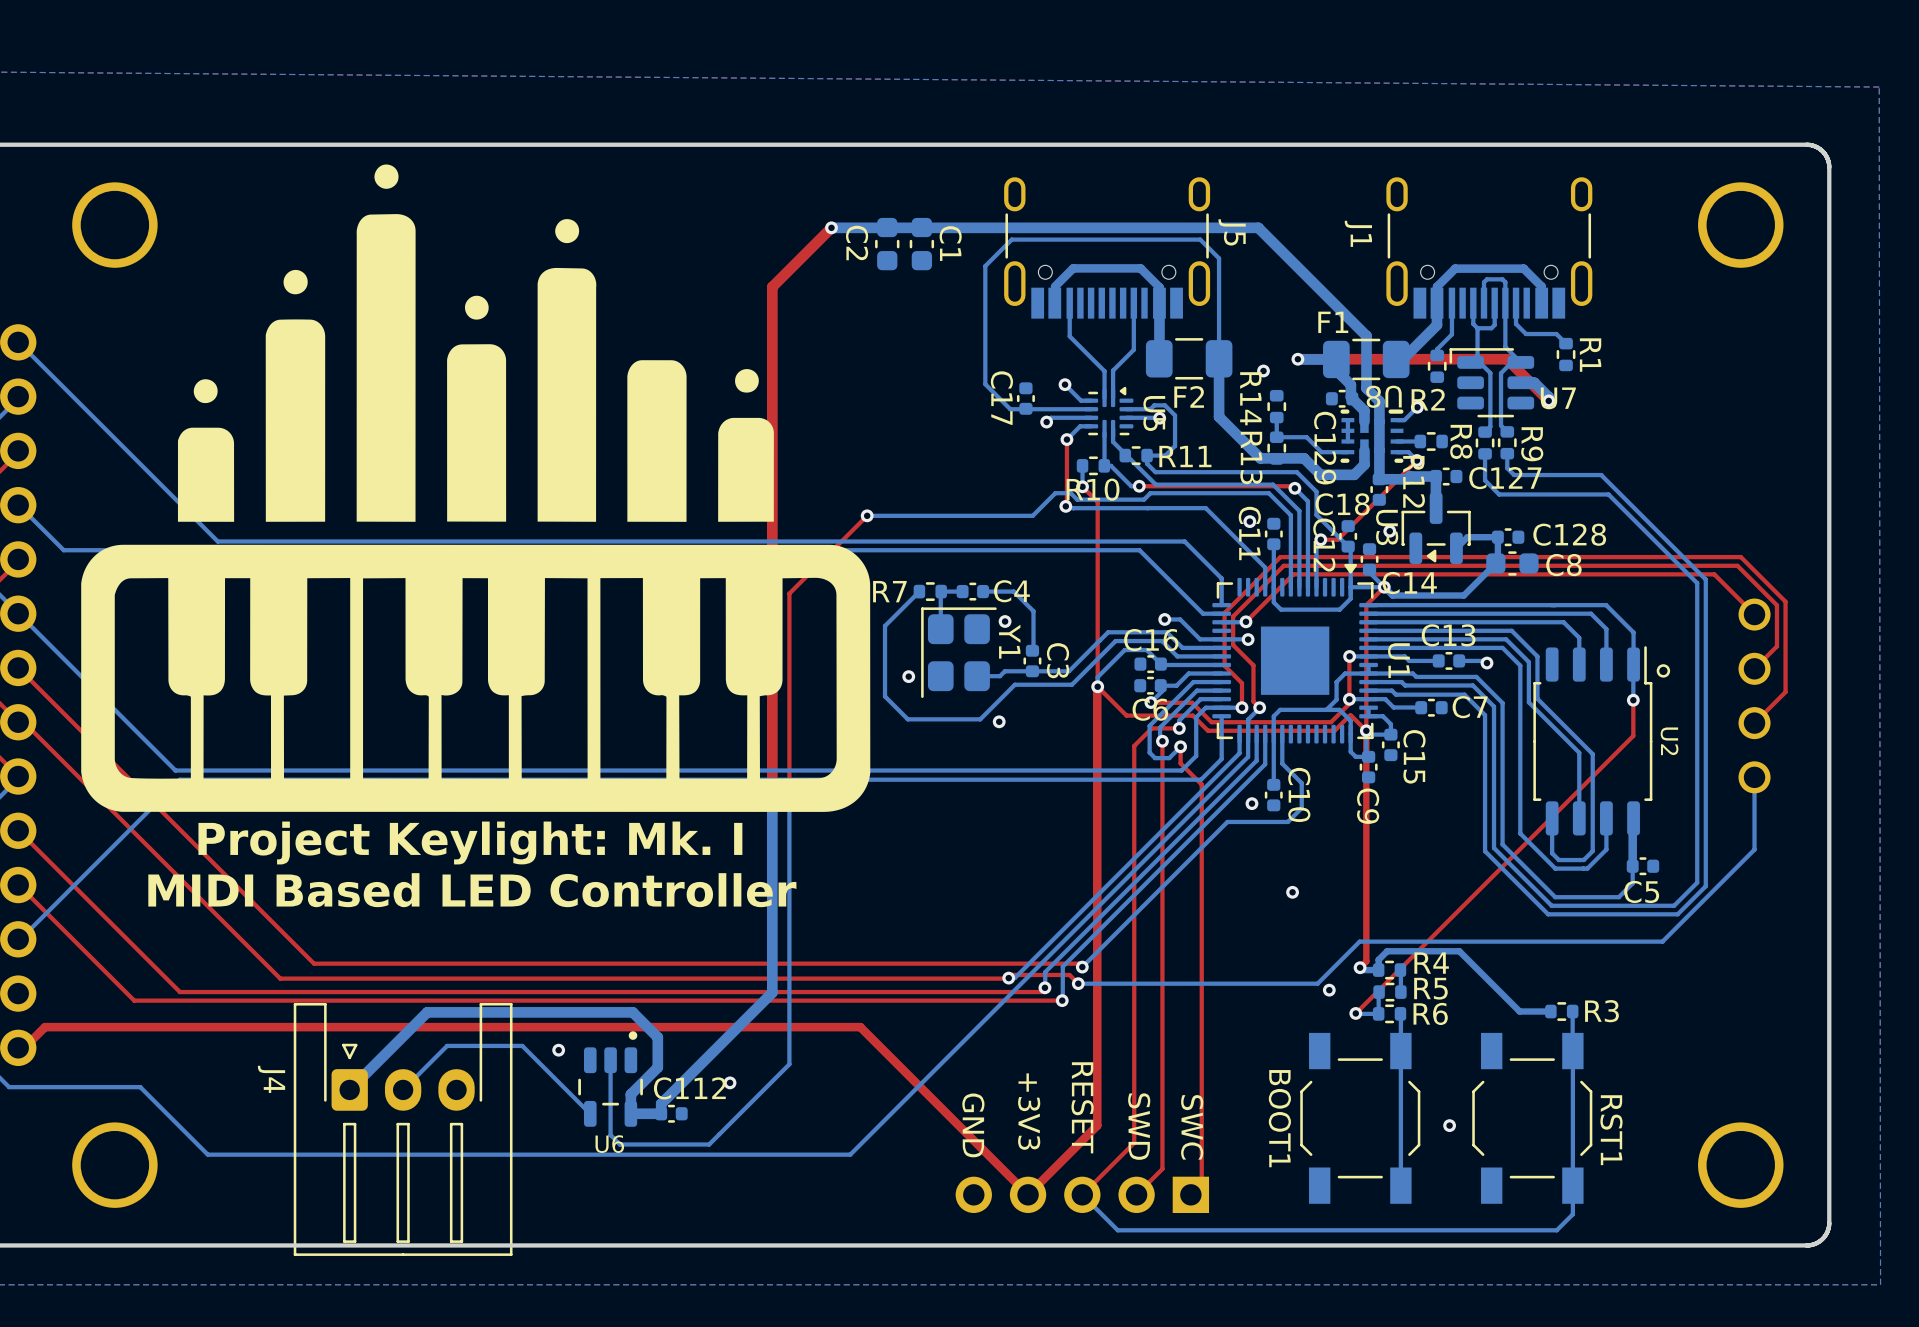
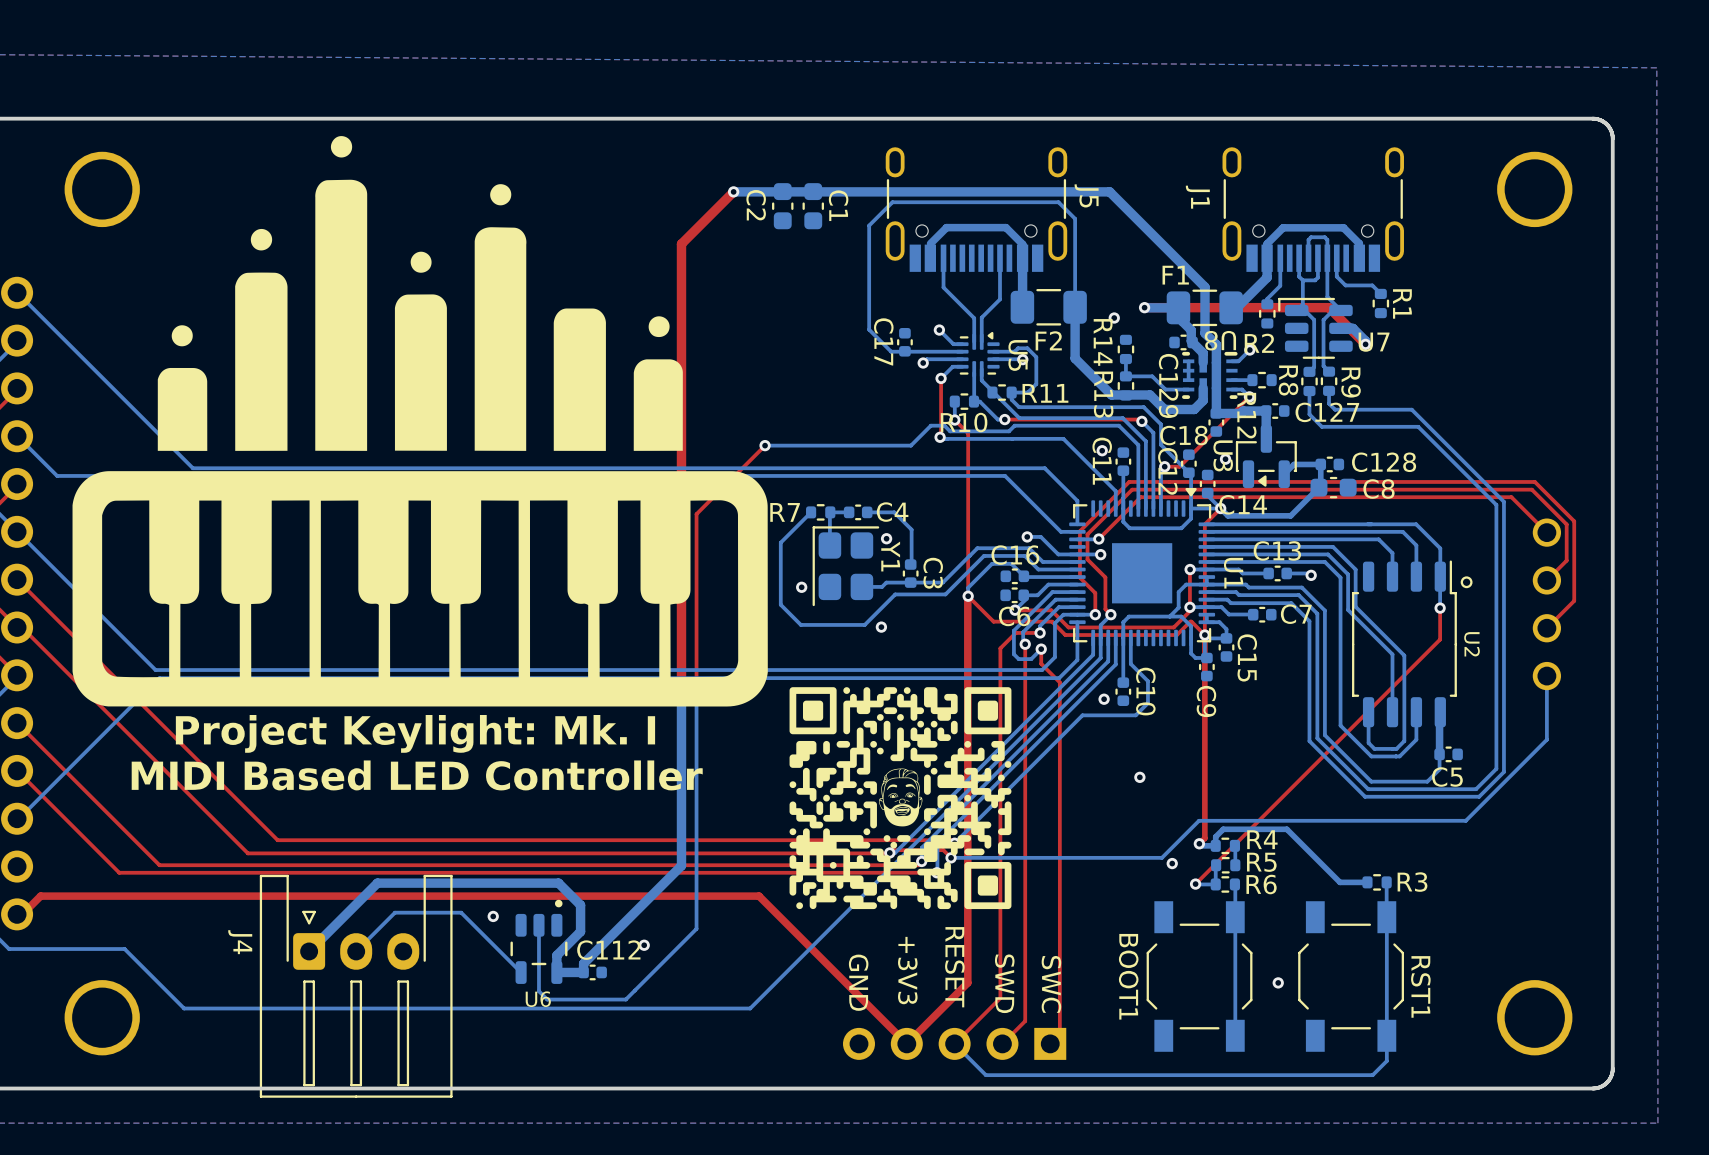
drawing: none -> [789, 687, 1012, 910]

